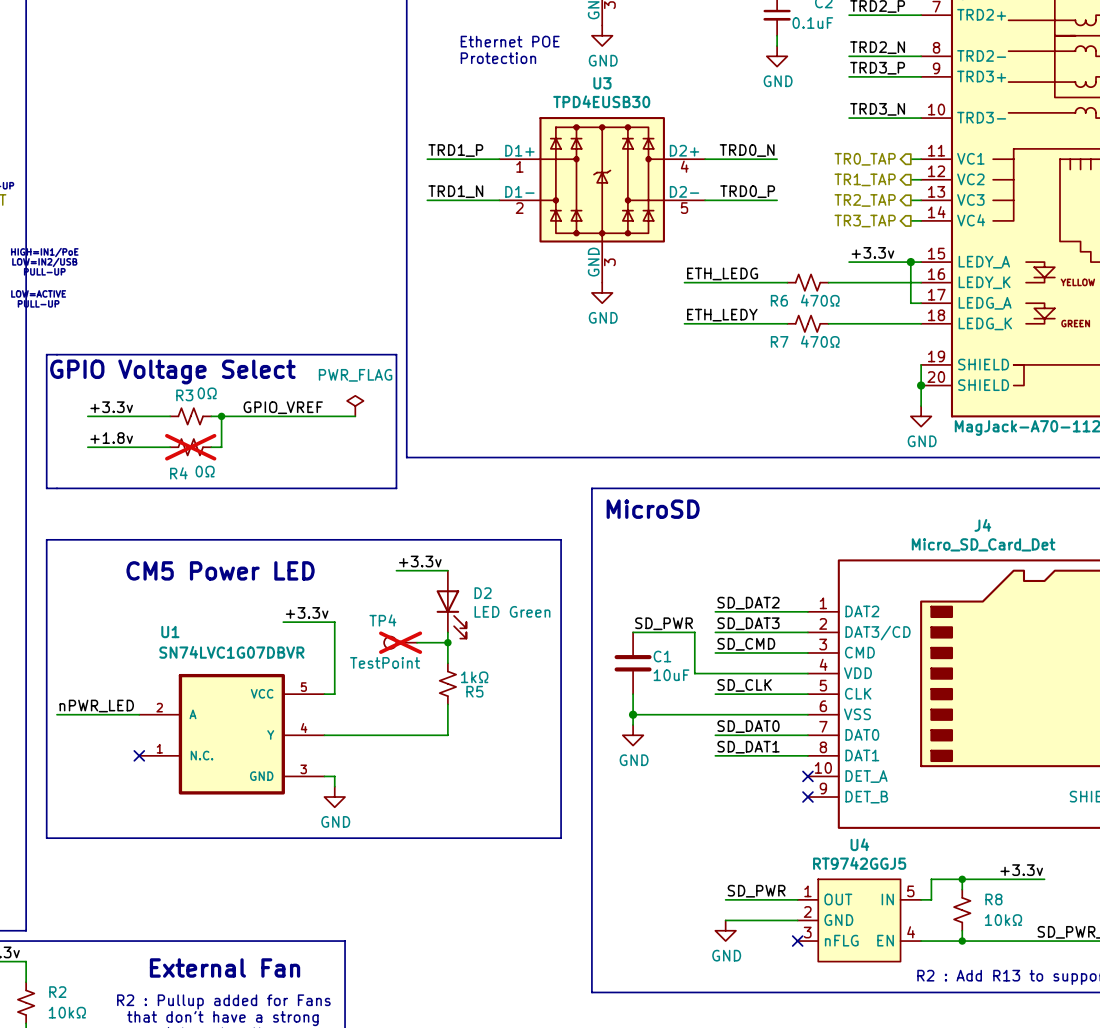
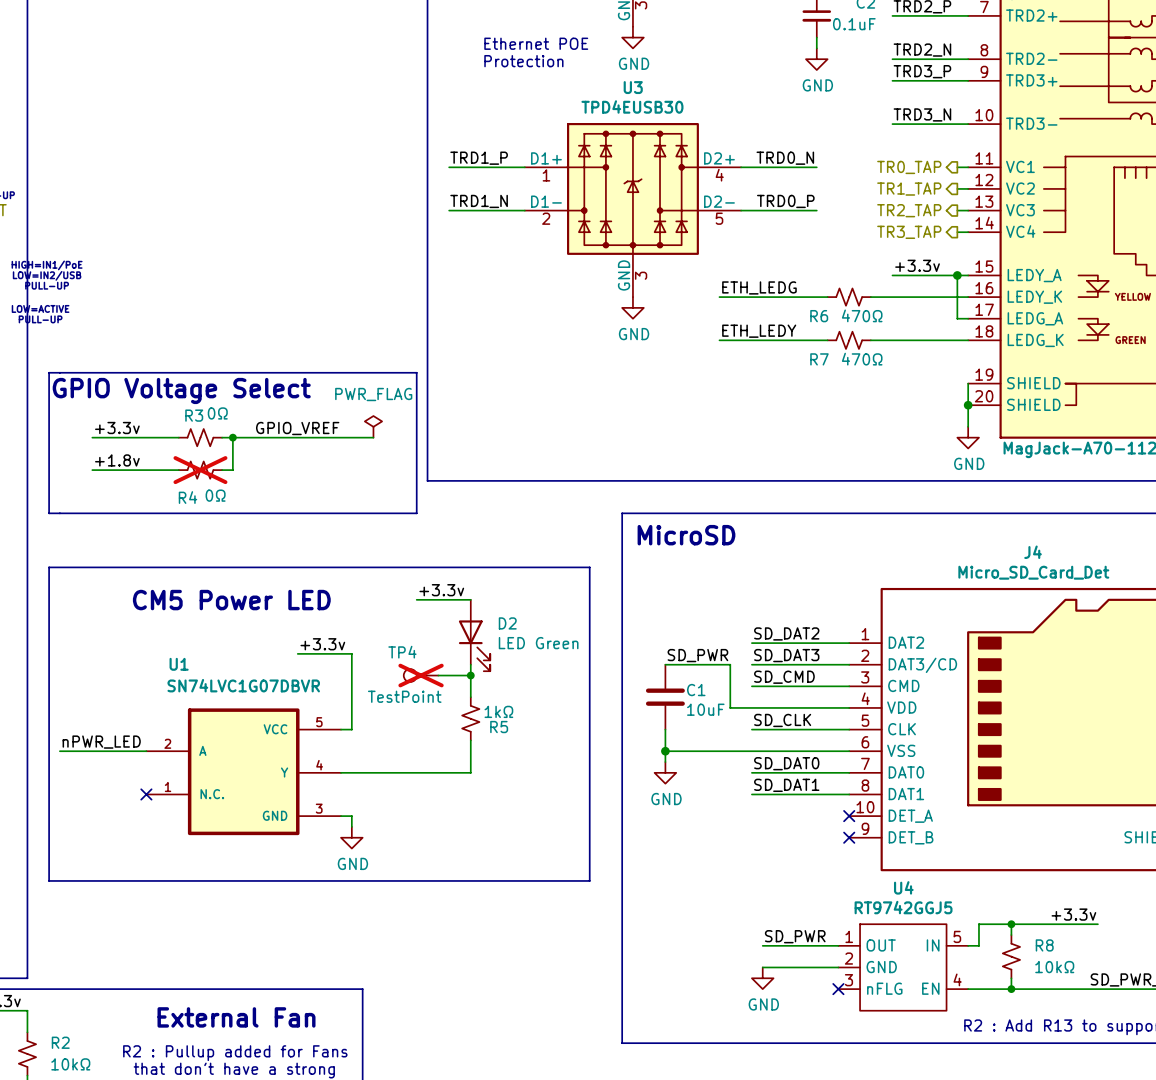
U4 symbol: [797, 879, 922, 962] -> [838, 924, 969, 1011]

